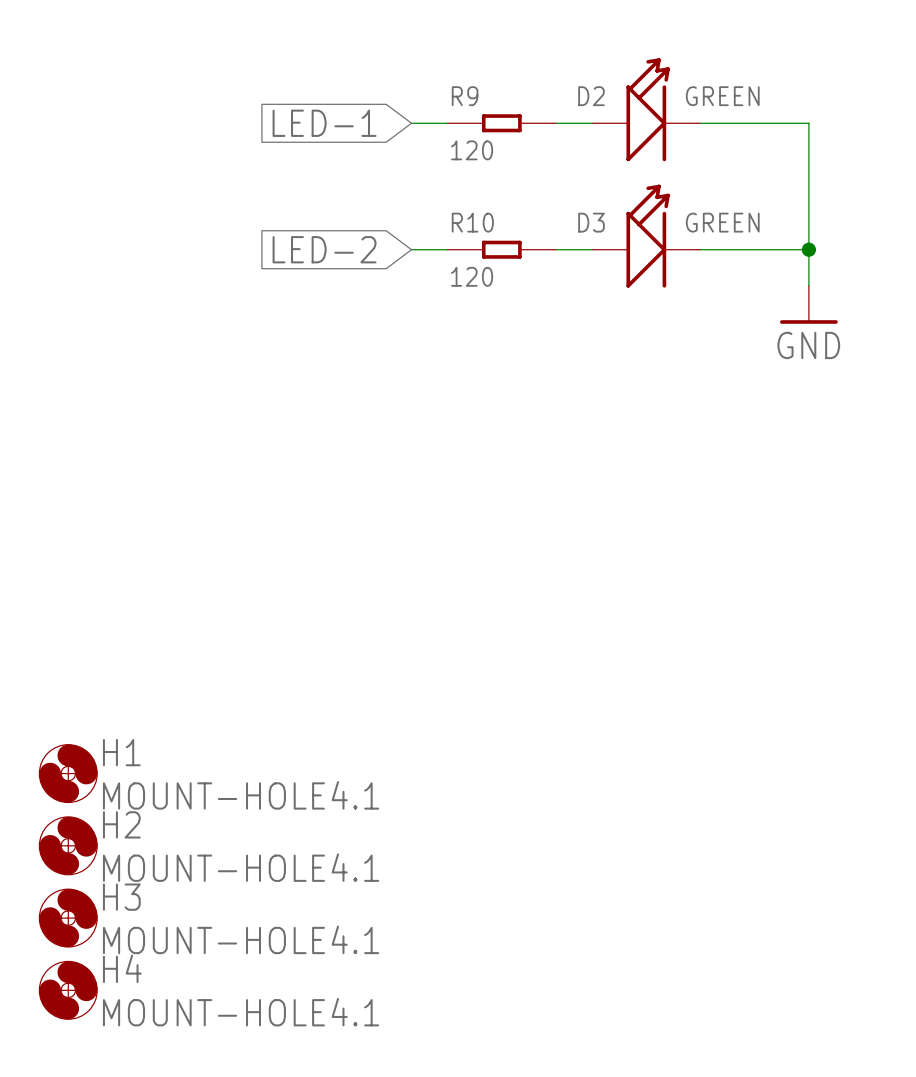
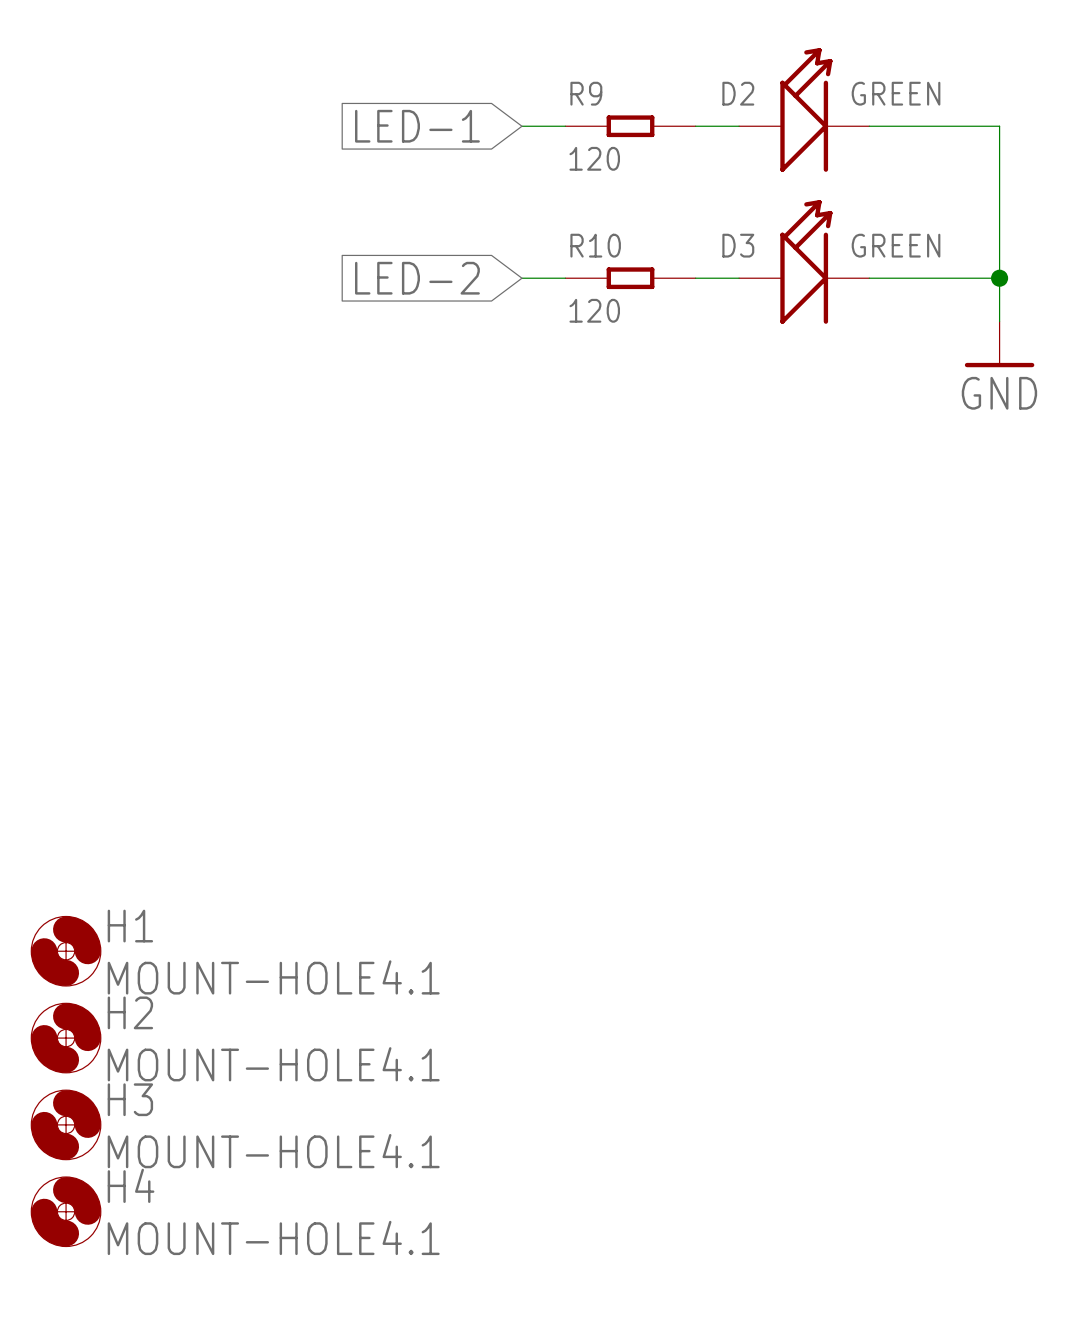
D2 position: (646, 109) -> (804, 109)
global label position: LED-1 (324, 123) -> LED-1 (417, 126)
wire: (411, 123) (447, 123) -> (521, 126) (565, 126)
R9 position: (501, 123) -> (630, 126)
wire: (556, 123) (592, 123) -> (695, 126) (739, 126)
wire: (700, 123) (808, 123) (808, 285) -> (869, 126) (999, 126) (999, 321)
D3 position: (646, 236) -> (804, 261)
global label position: LED-2 (324, 249) -> LED-2 (417, 278)
wire: (411, 249) (447, 249) -> (521, 278) (565, 278)
R10 position: (501, 249) -> (630, 278)
wire: (556, 249) (592, 249) -> (695, 278) (739, 278)
wire: (700, 249) (808, 249) -> (869, 278) (999, 278)
junction position: (808, 249) -> (999, 278)
power symbol position: GND (808, 304) -> GND (999, 344)

